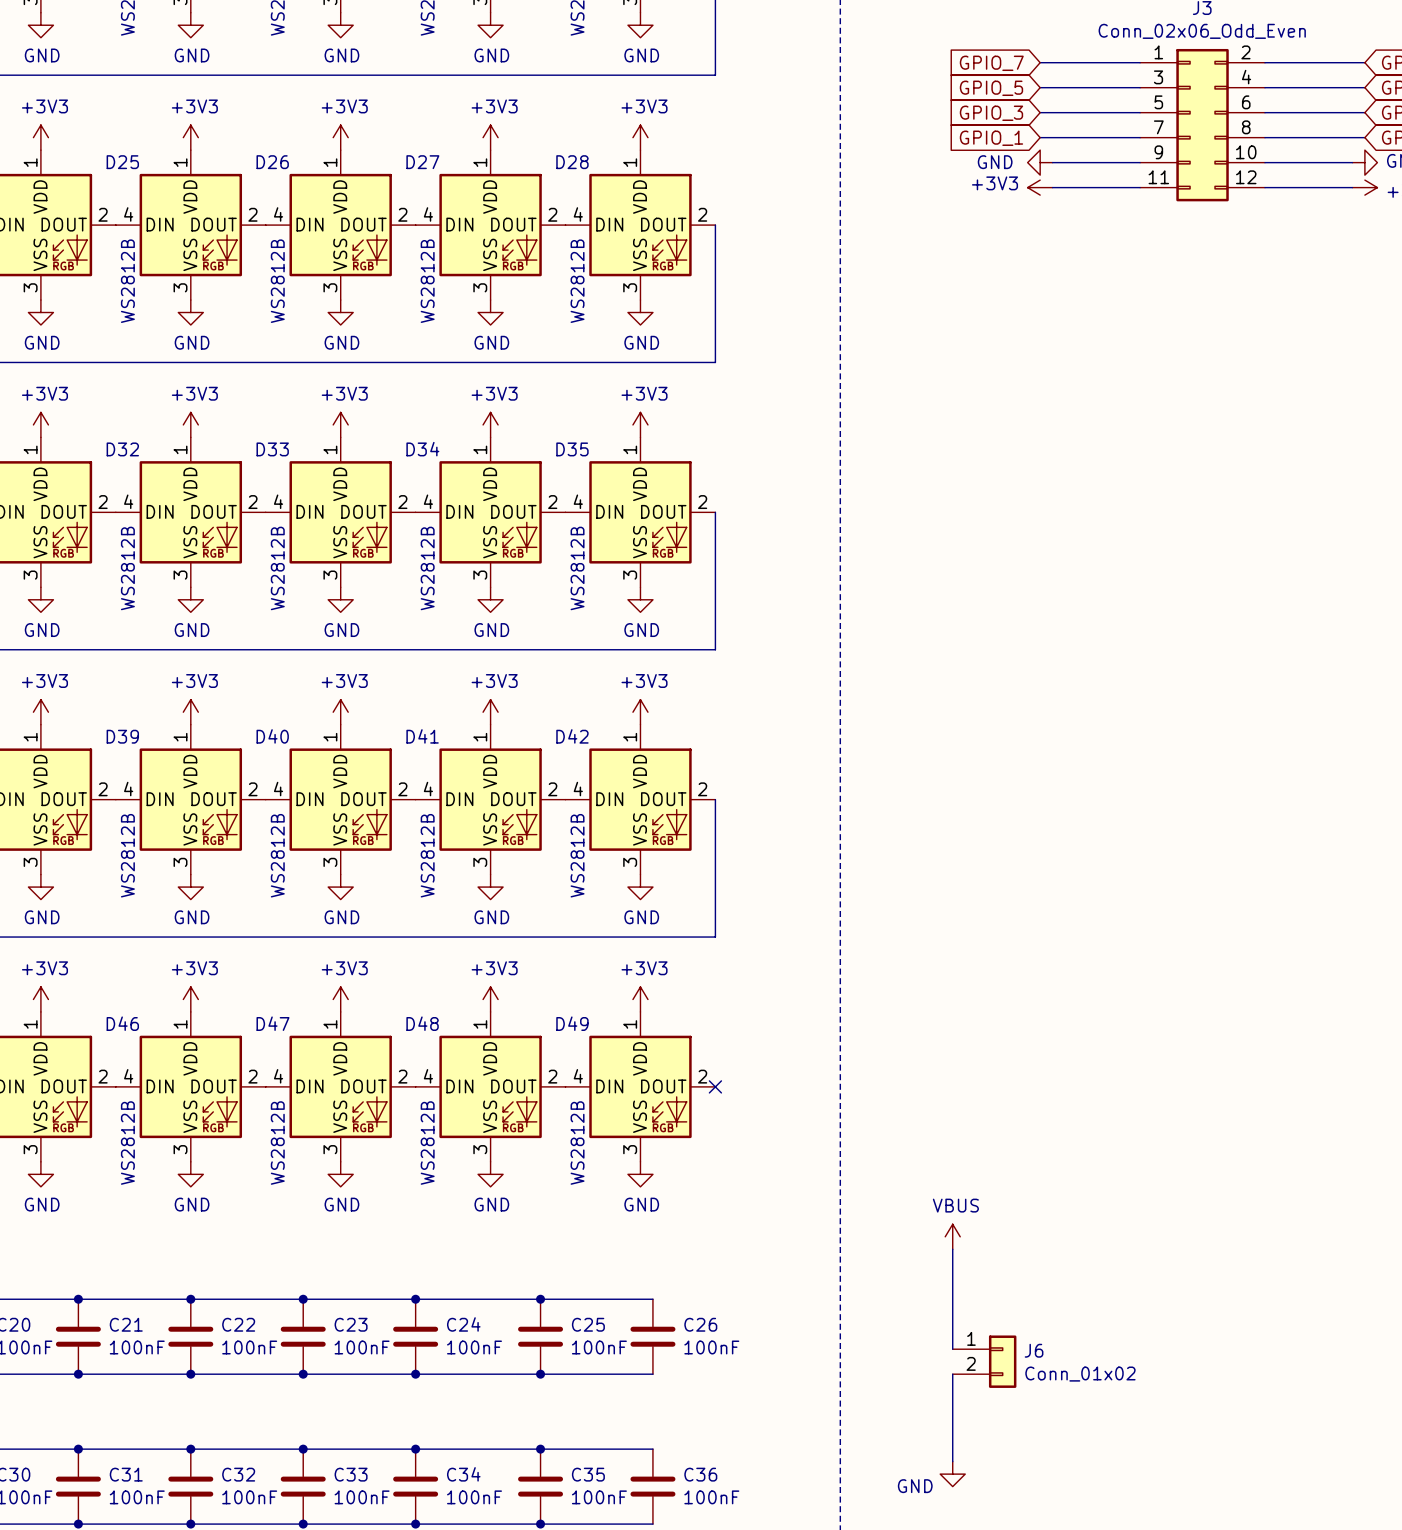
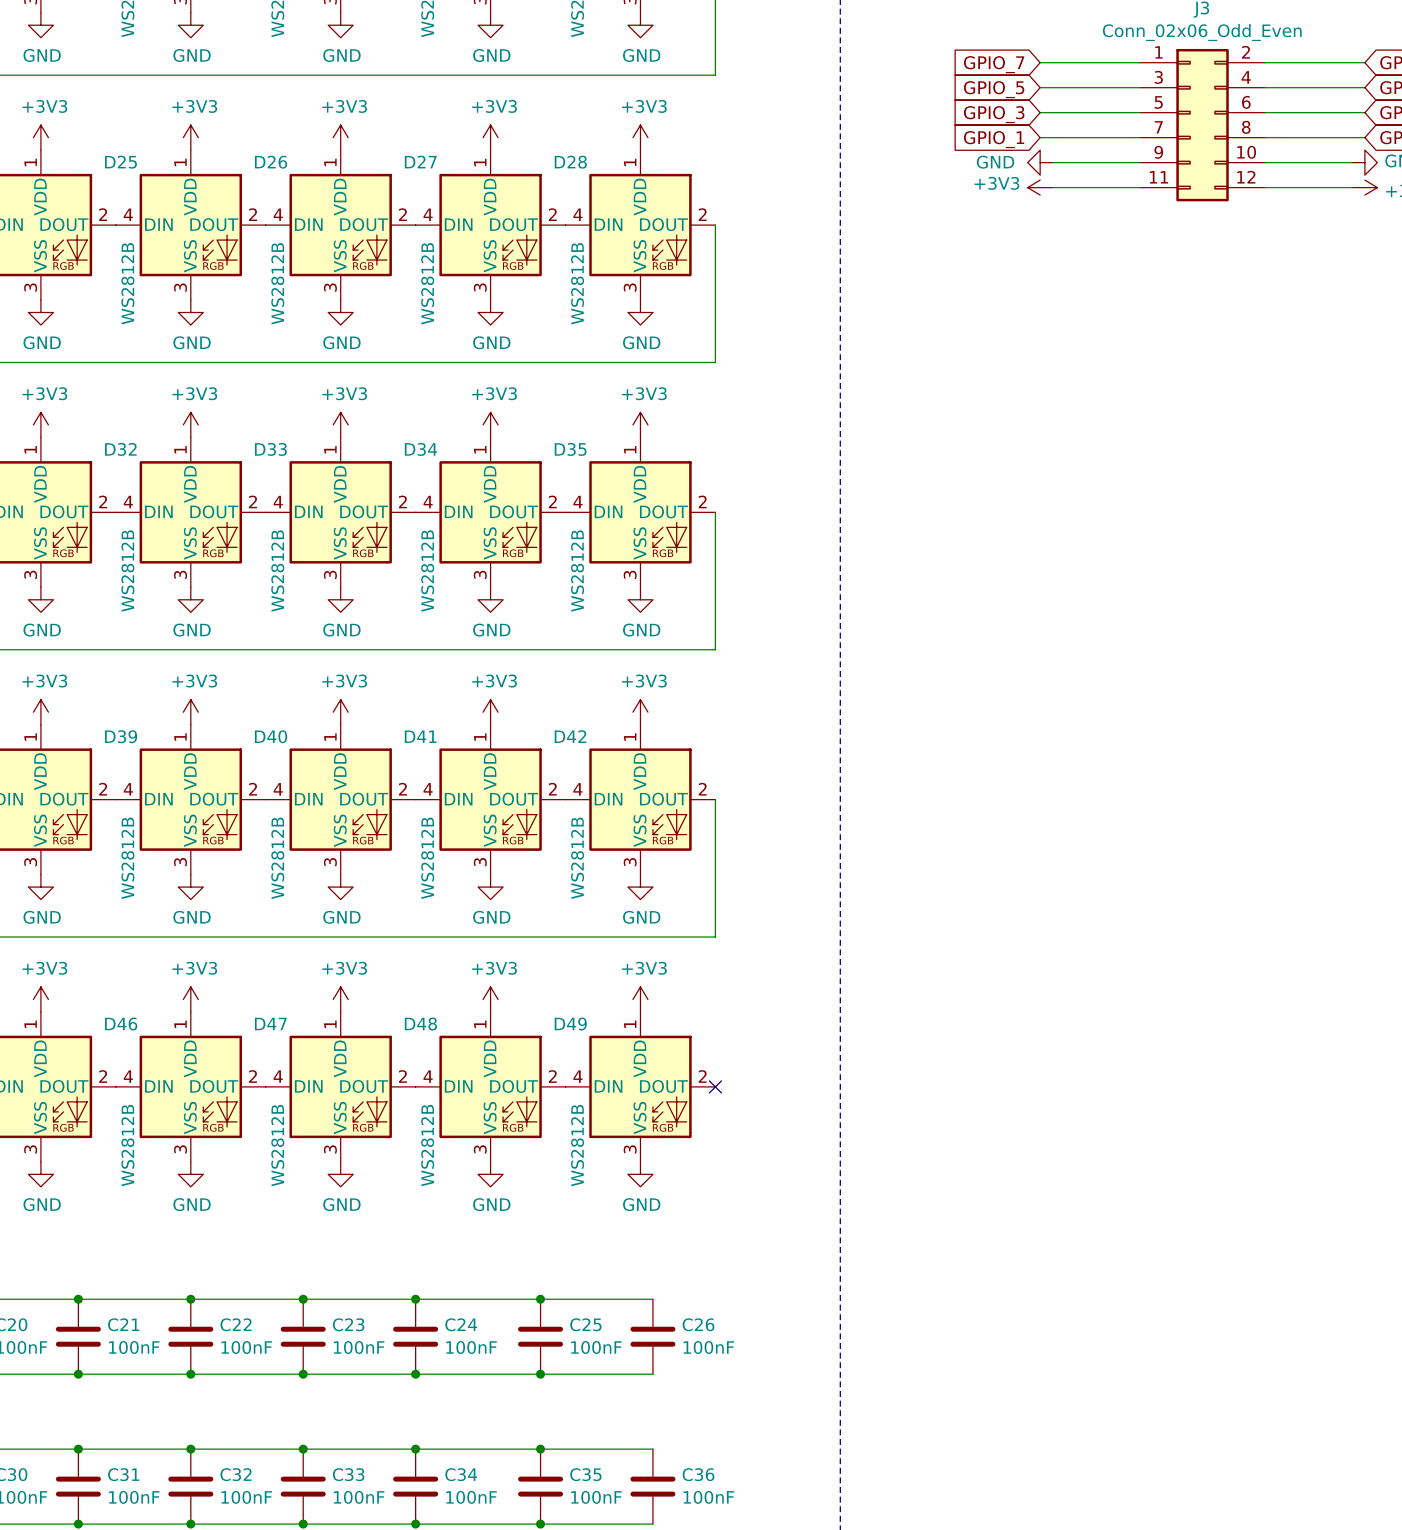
power symbol: VBUS (952, 1236) -> none
wire: (952, 1249) (952, 1349) -> none
J6: Conn_01x02 (984, 1361) -> none
wire: (952, 1374) (952, 1461) -> none
power symbol: GND (952, 1474) -> none

